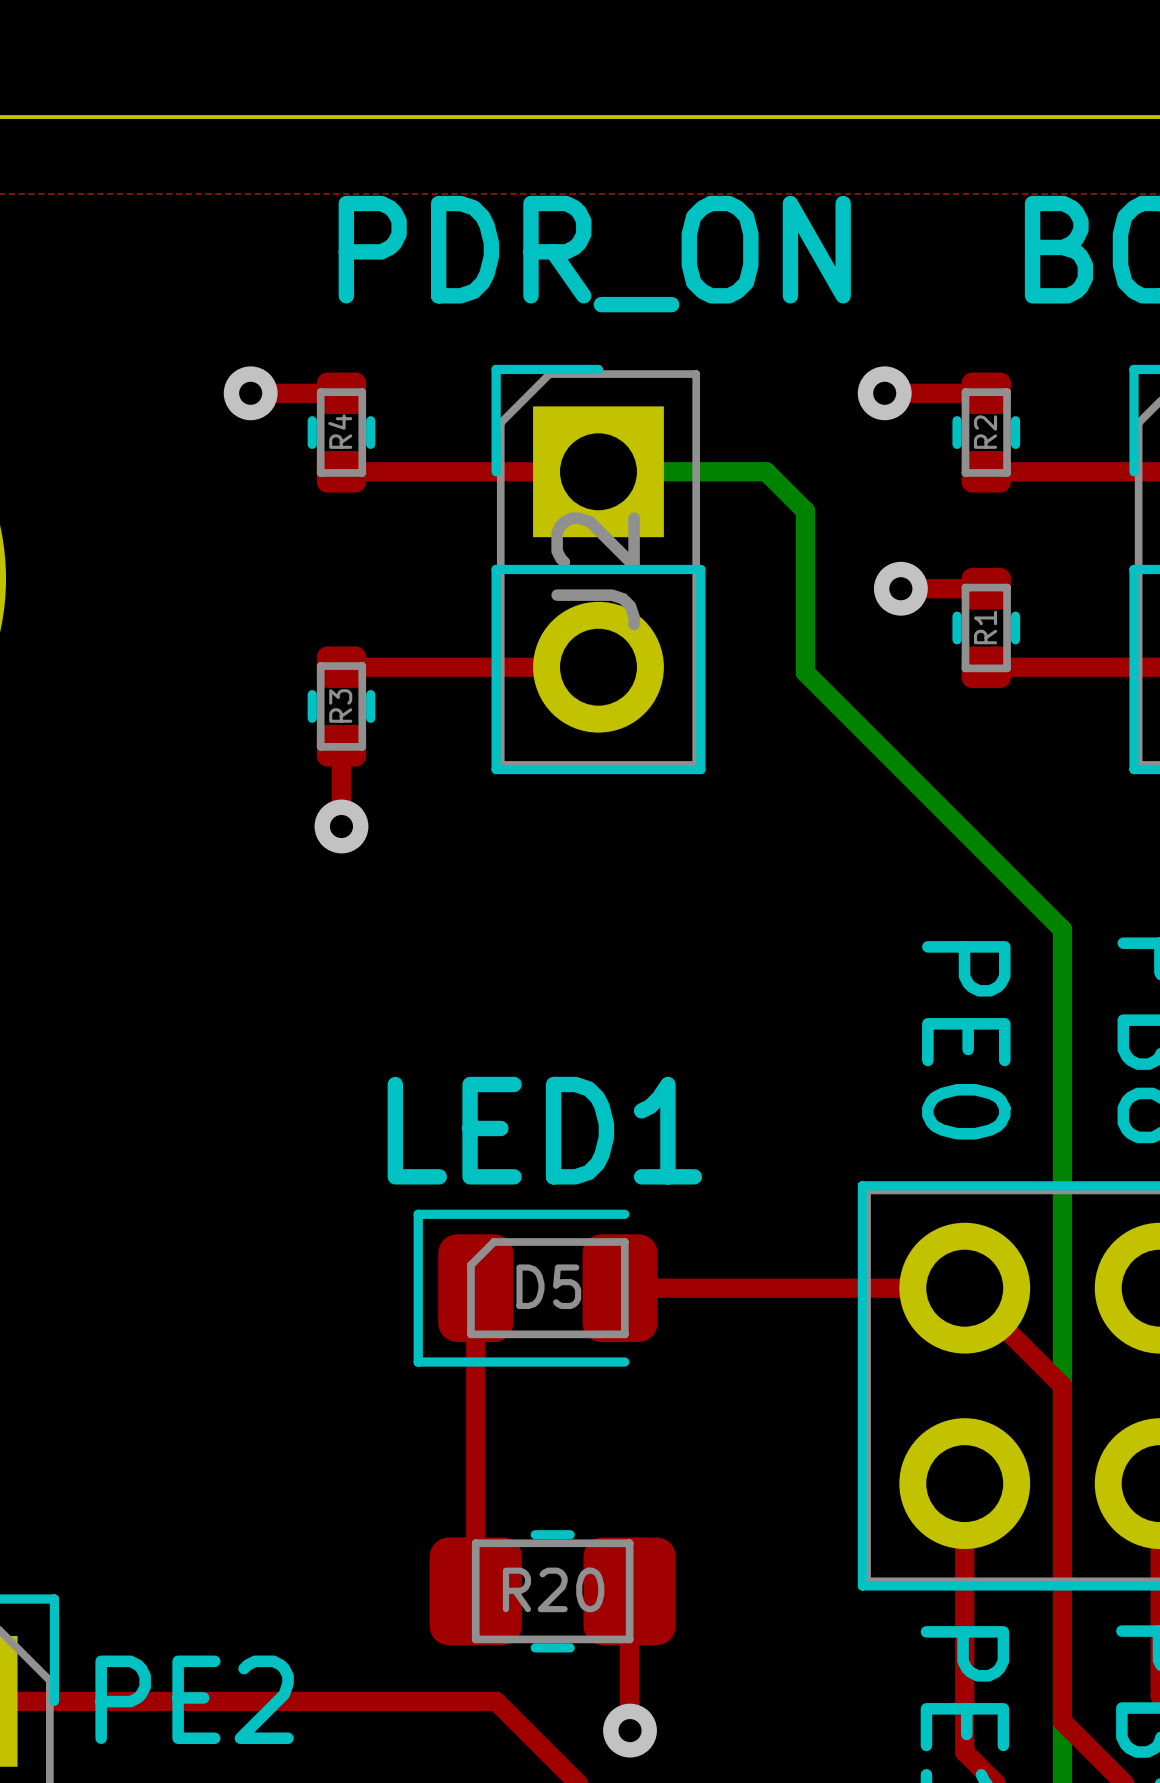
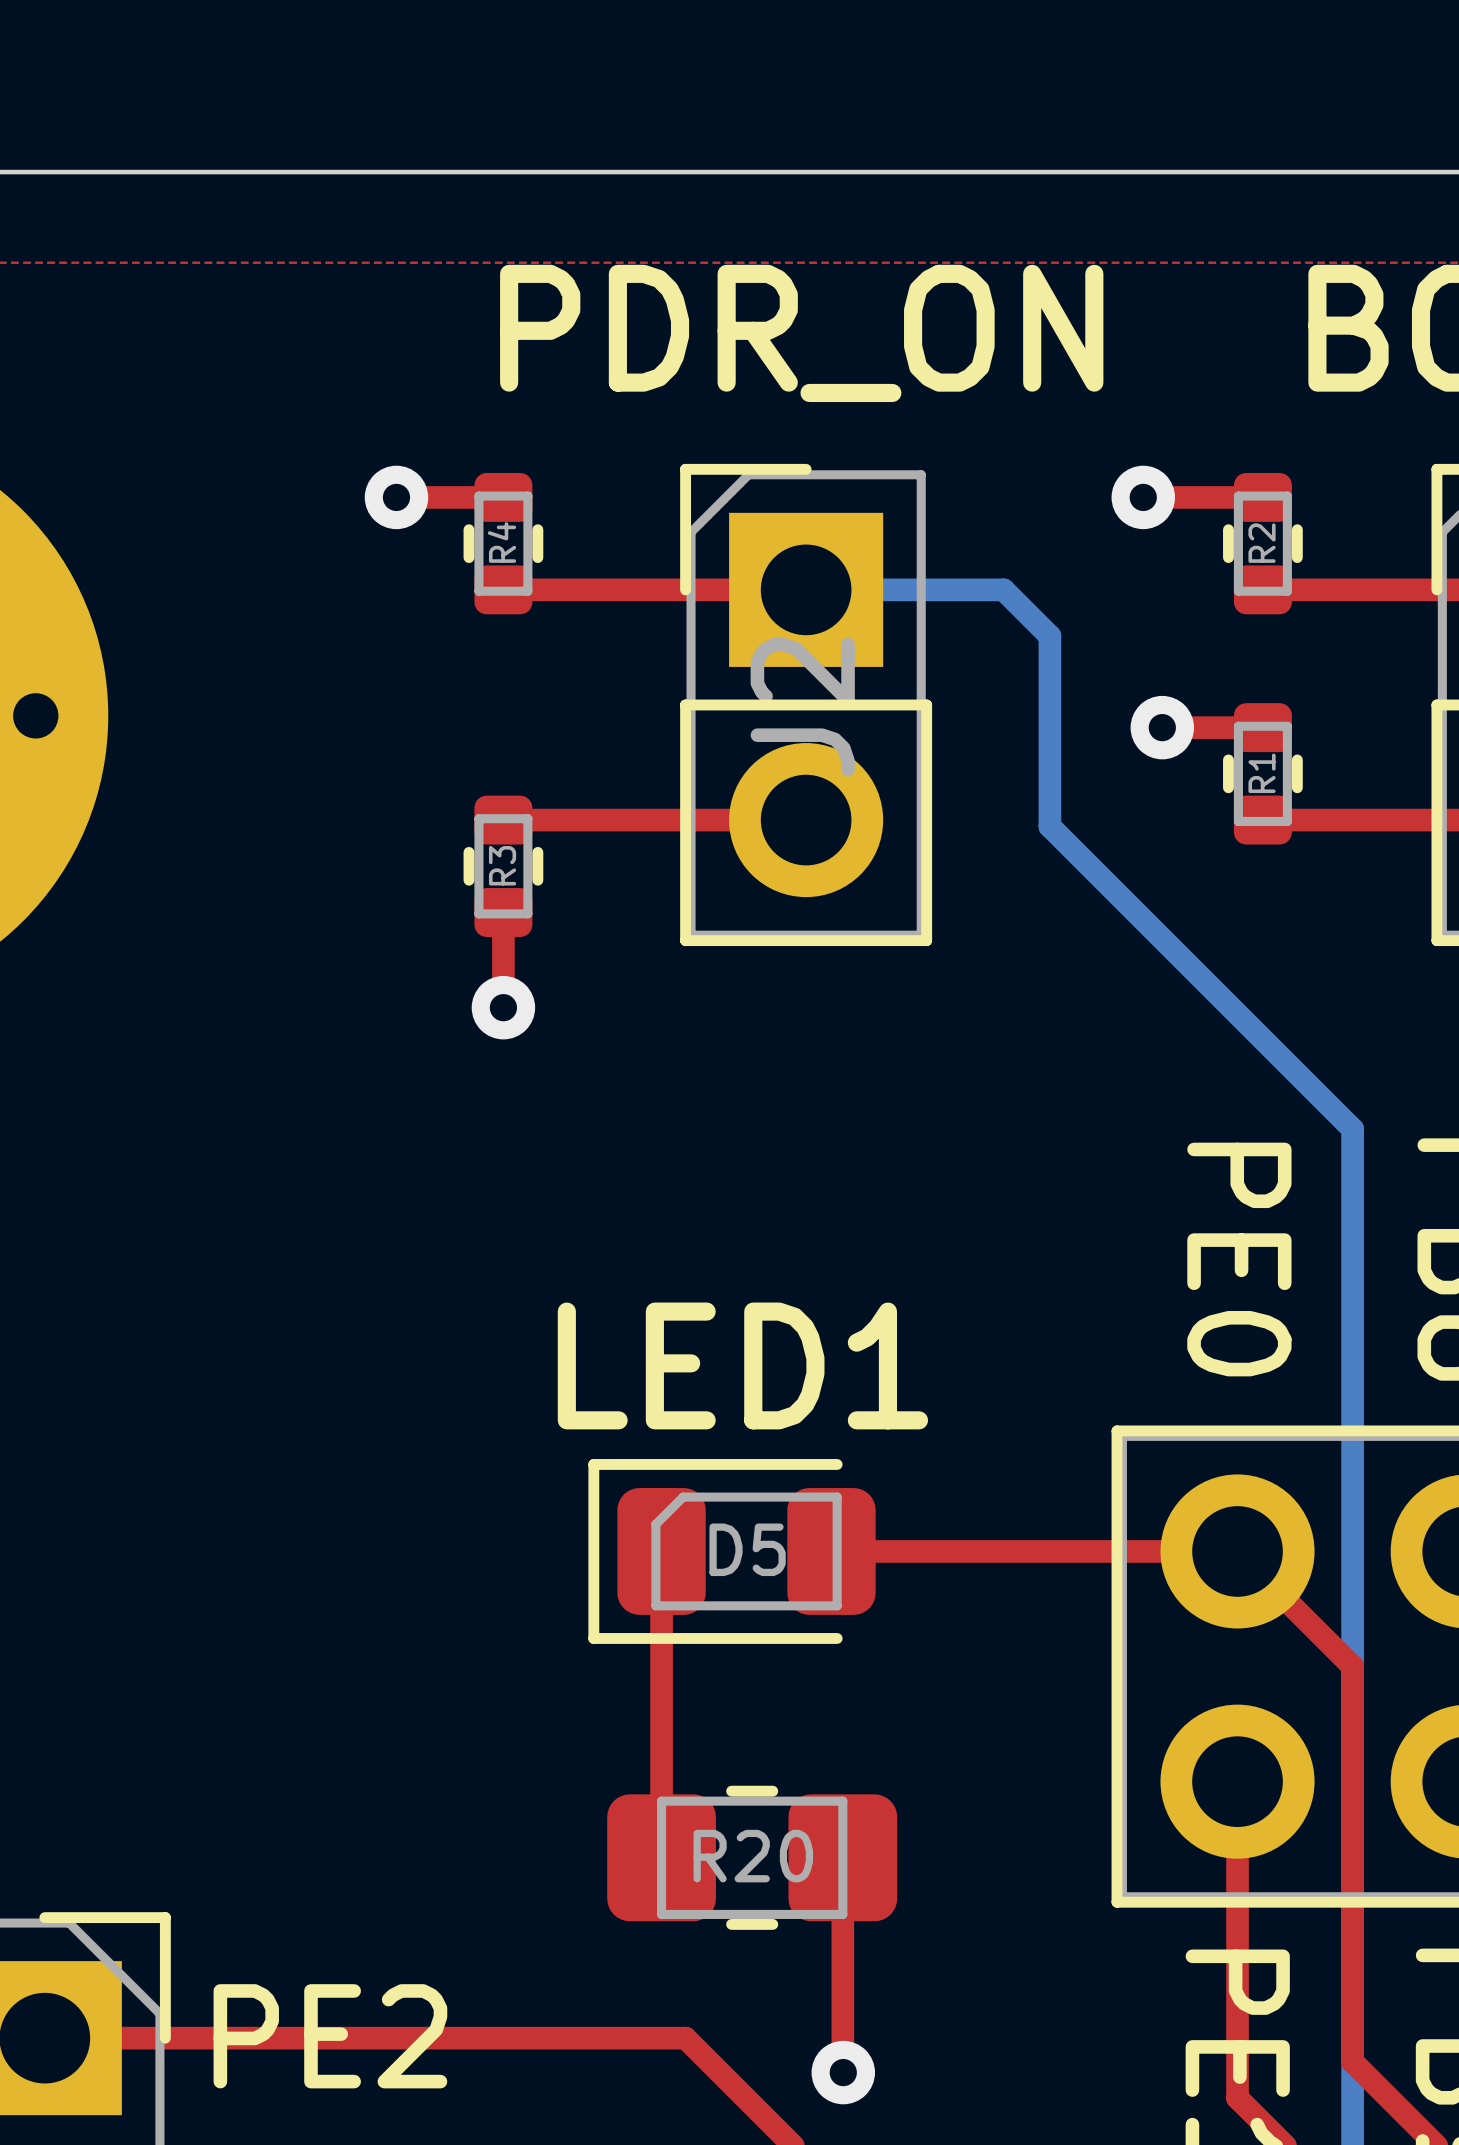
R20 position: (552, 1591) -> (752, 1857)

